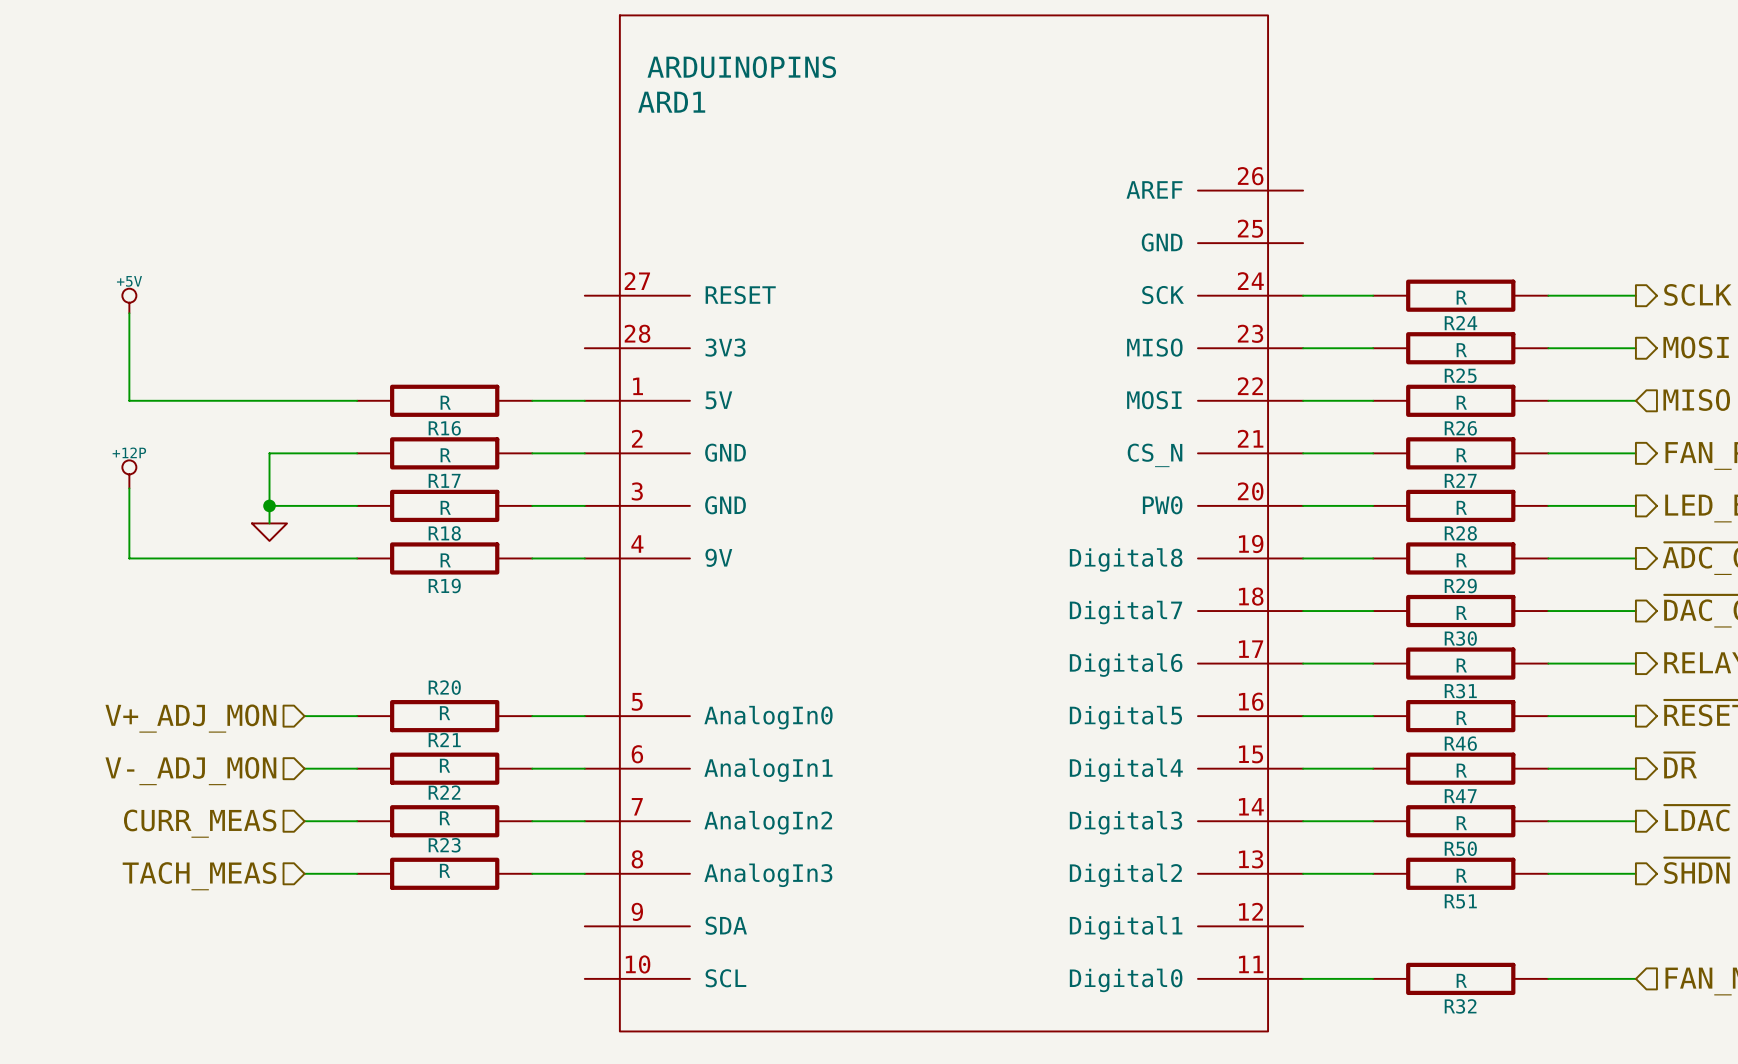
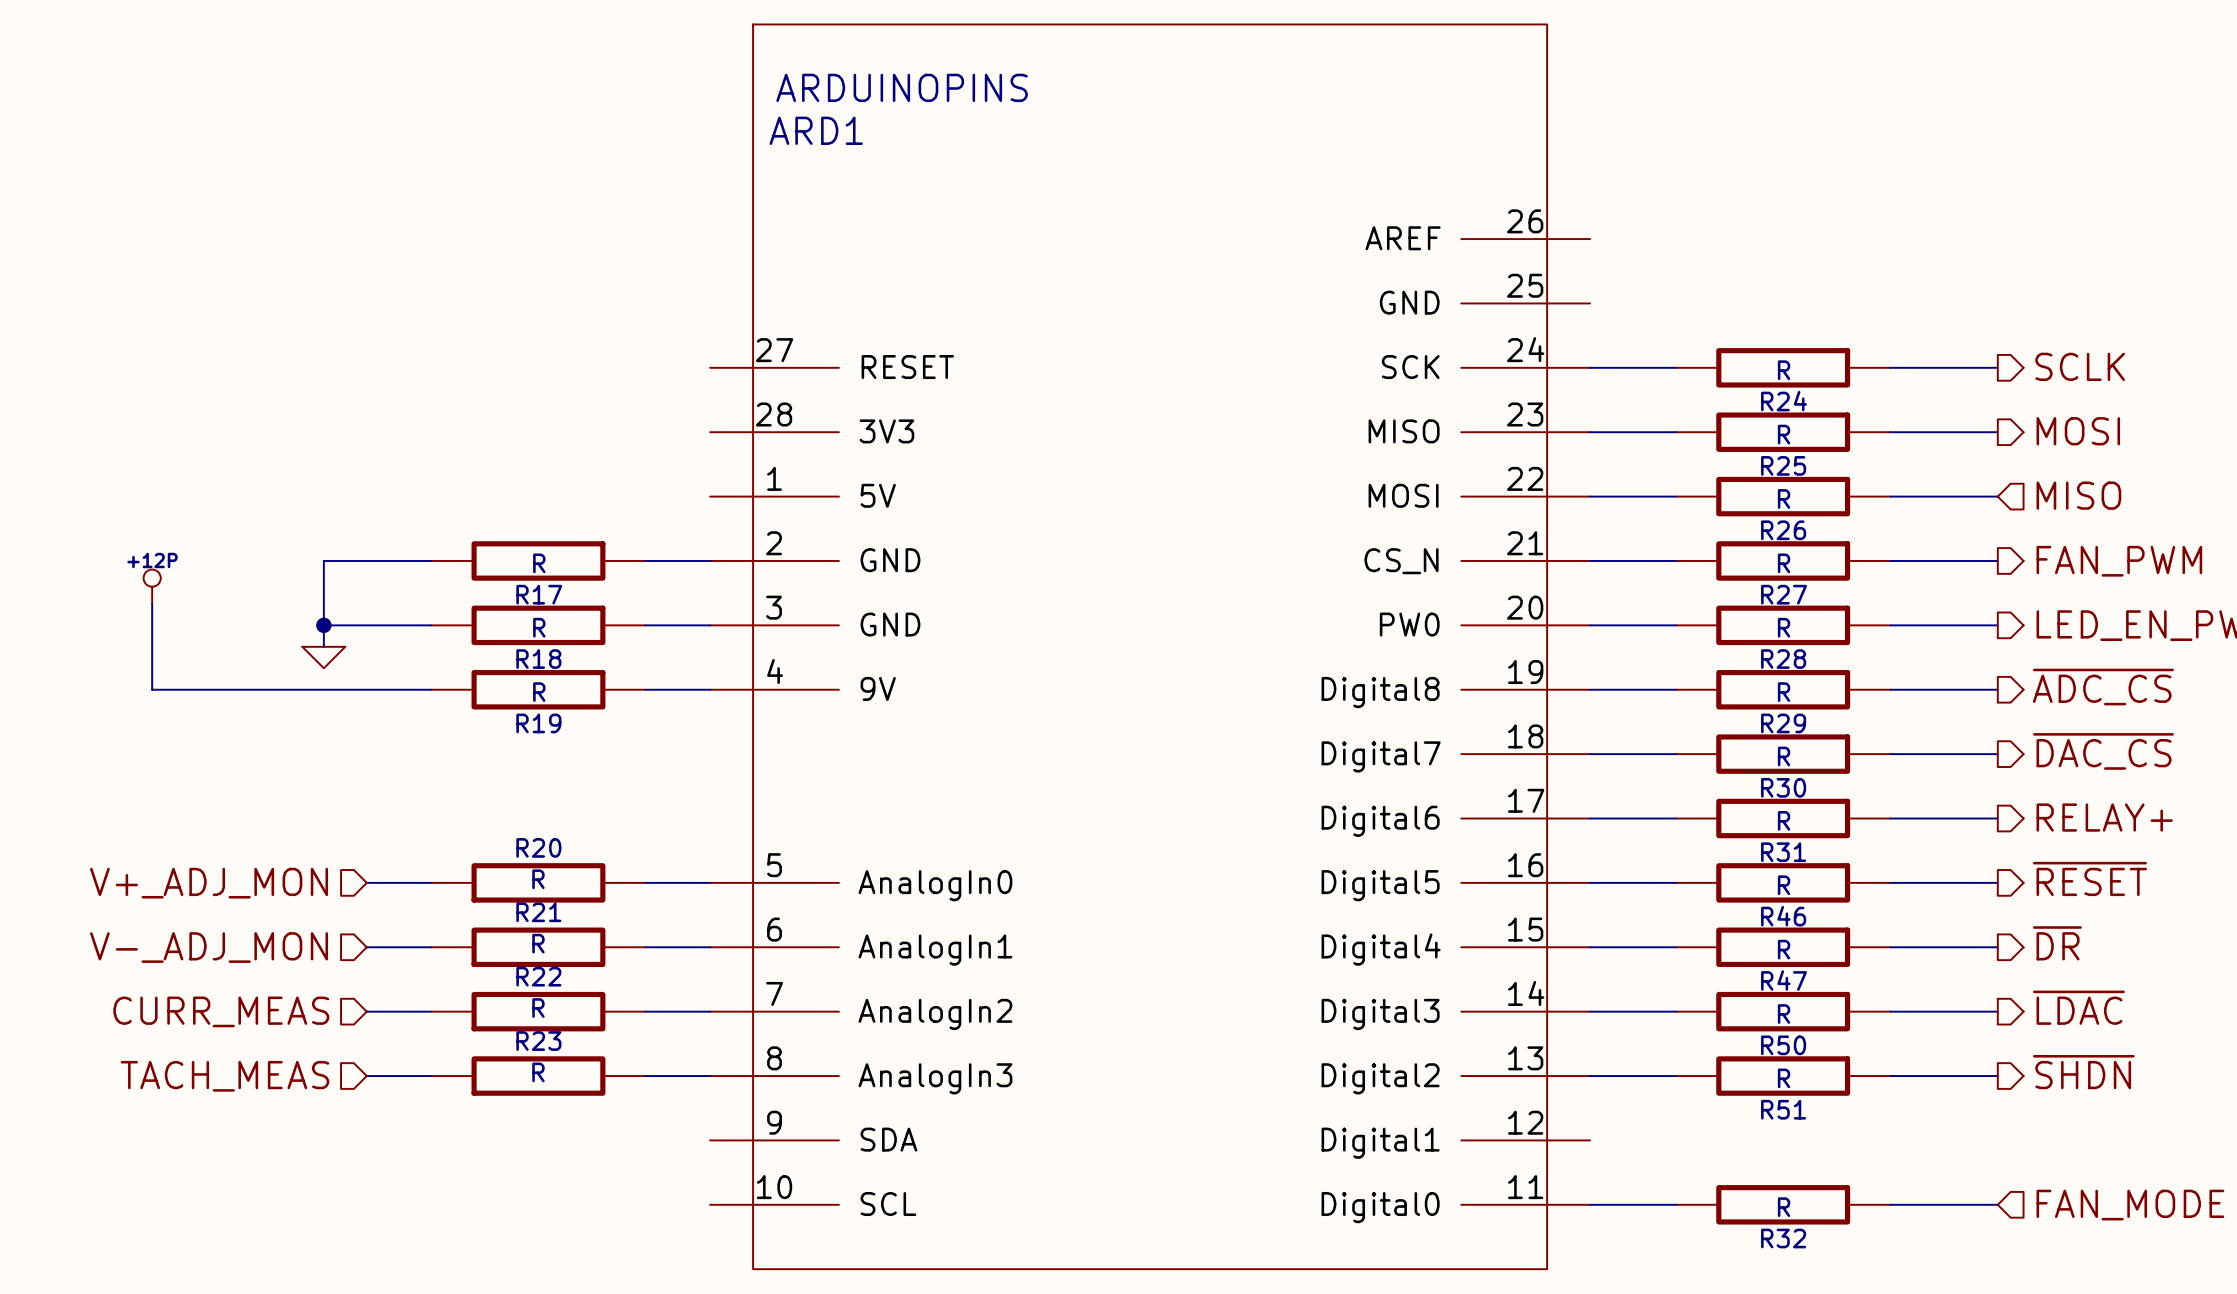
power symbol: +5V (129, 300) -> none
wire: (129, 313) (129, 400) (357, 400) -> none
R16: R (444, 400) -> none
wire: (532, 400) (584, 400) -> none

